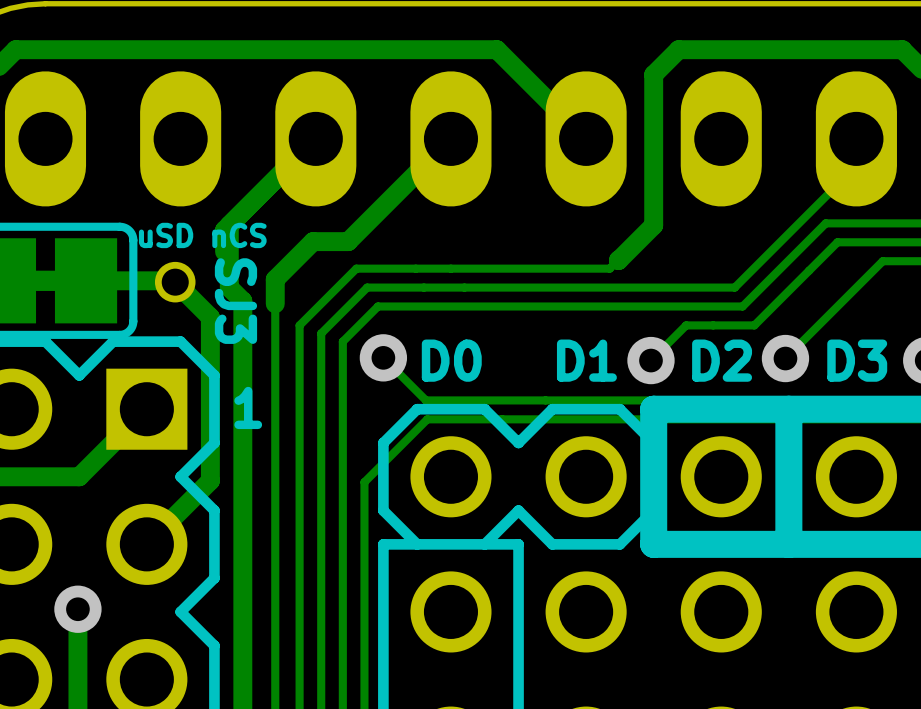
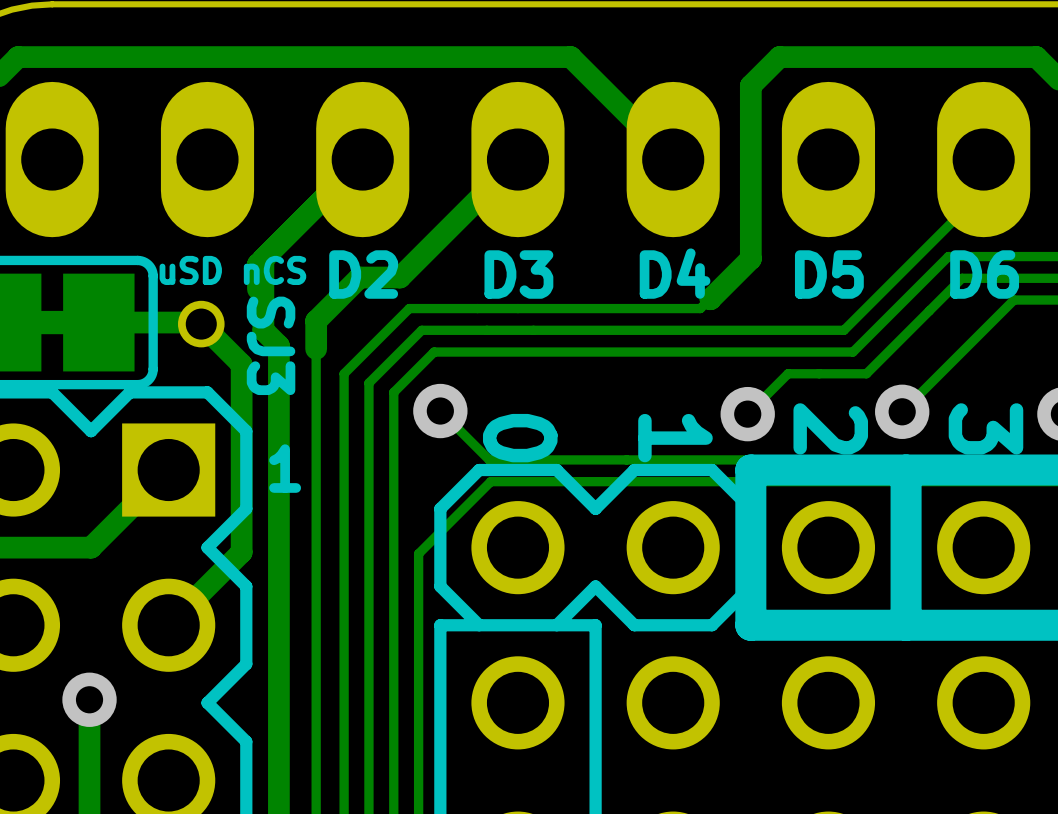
text: none -> D4 (675, 273)
text: none -> D2 (363, 274)
text: none -> D3 (518, 274)
text: none -> D5 (829, 274)
text: none -> D6 (984, 274)
text: D0 (451, 360) -> 0 (520, 438)
text: D1 (586, 360) -> 1 (675, 438)
text: D2 (722, 360) -> 2 (830, 428)
text: D3 (857, 360) -> 3 (985, 428)

